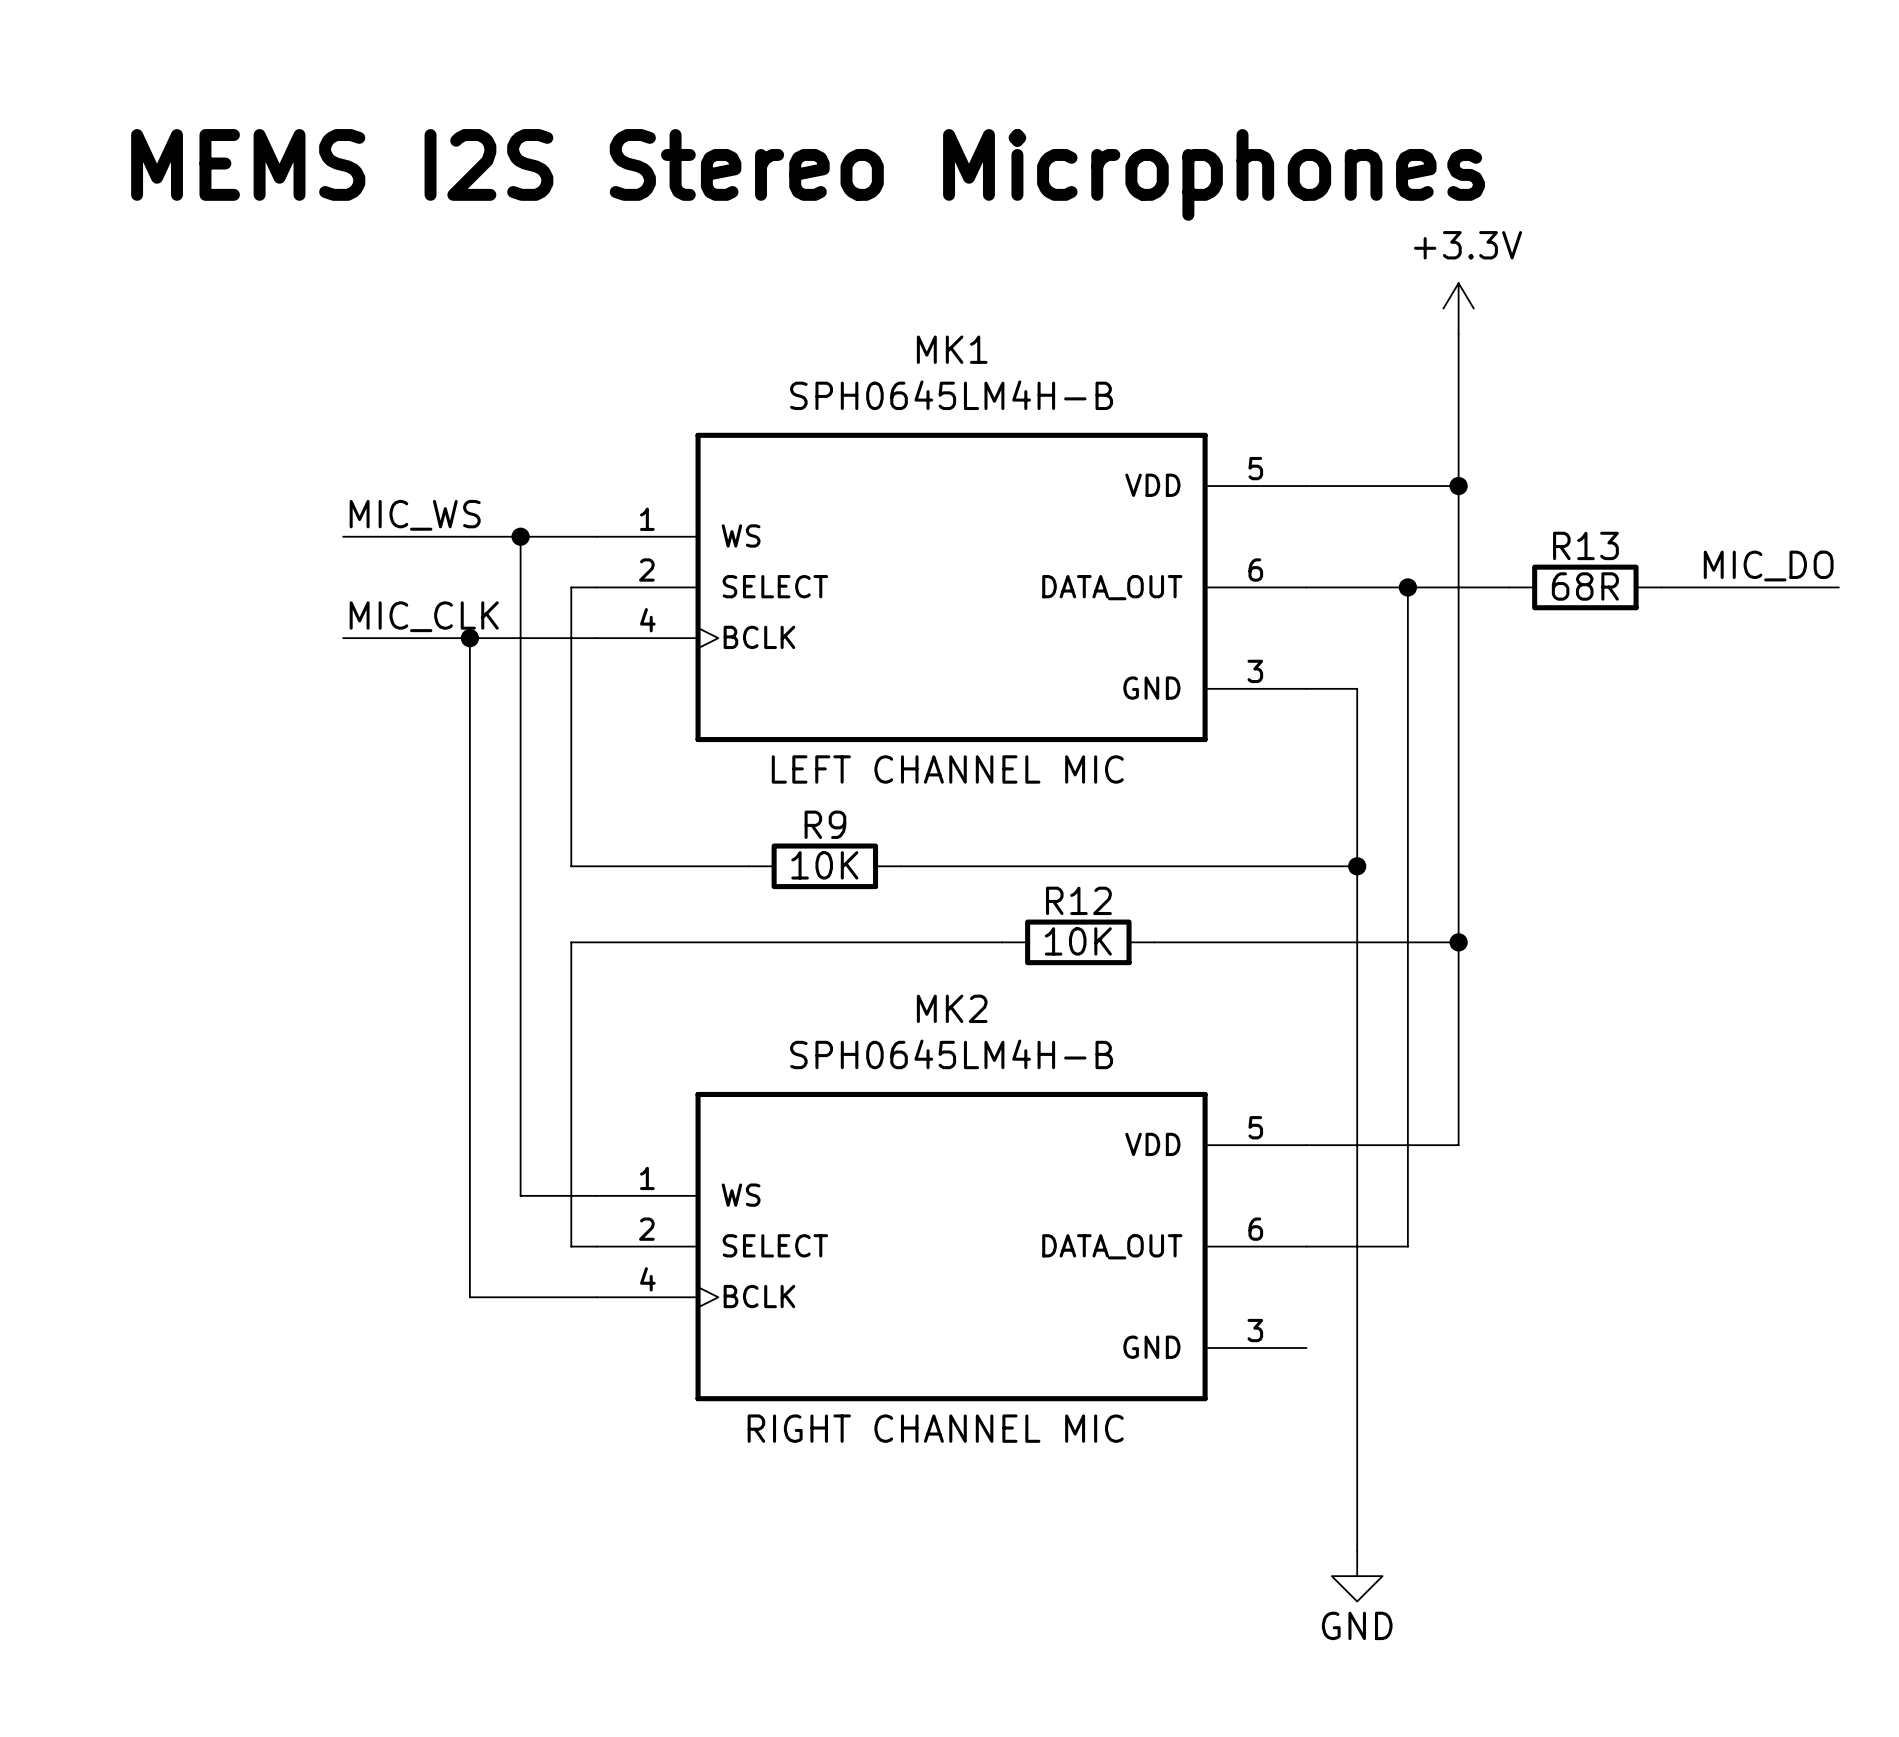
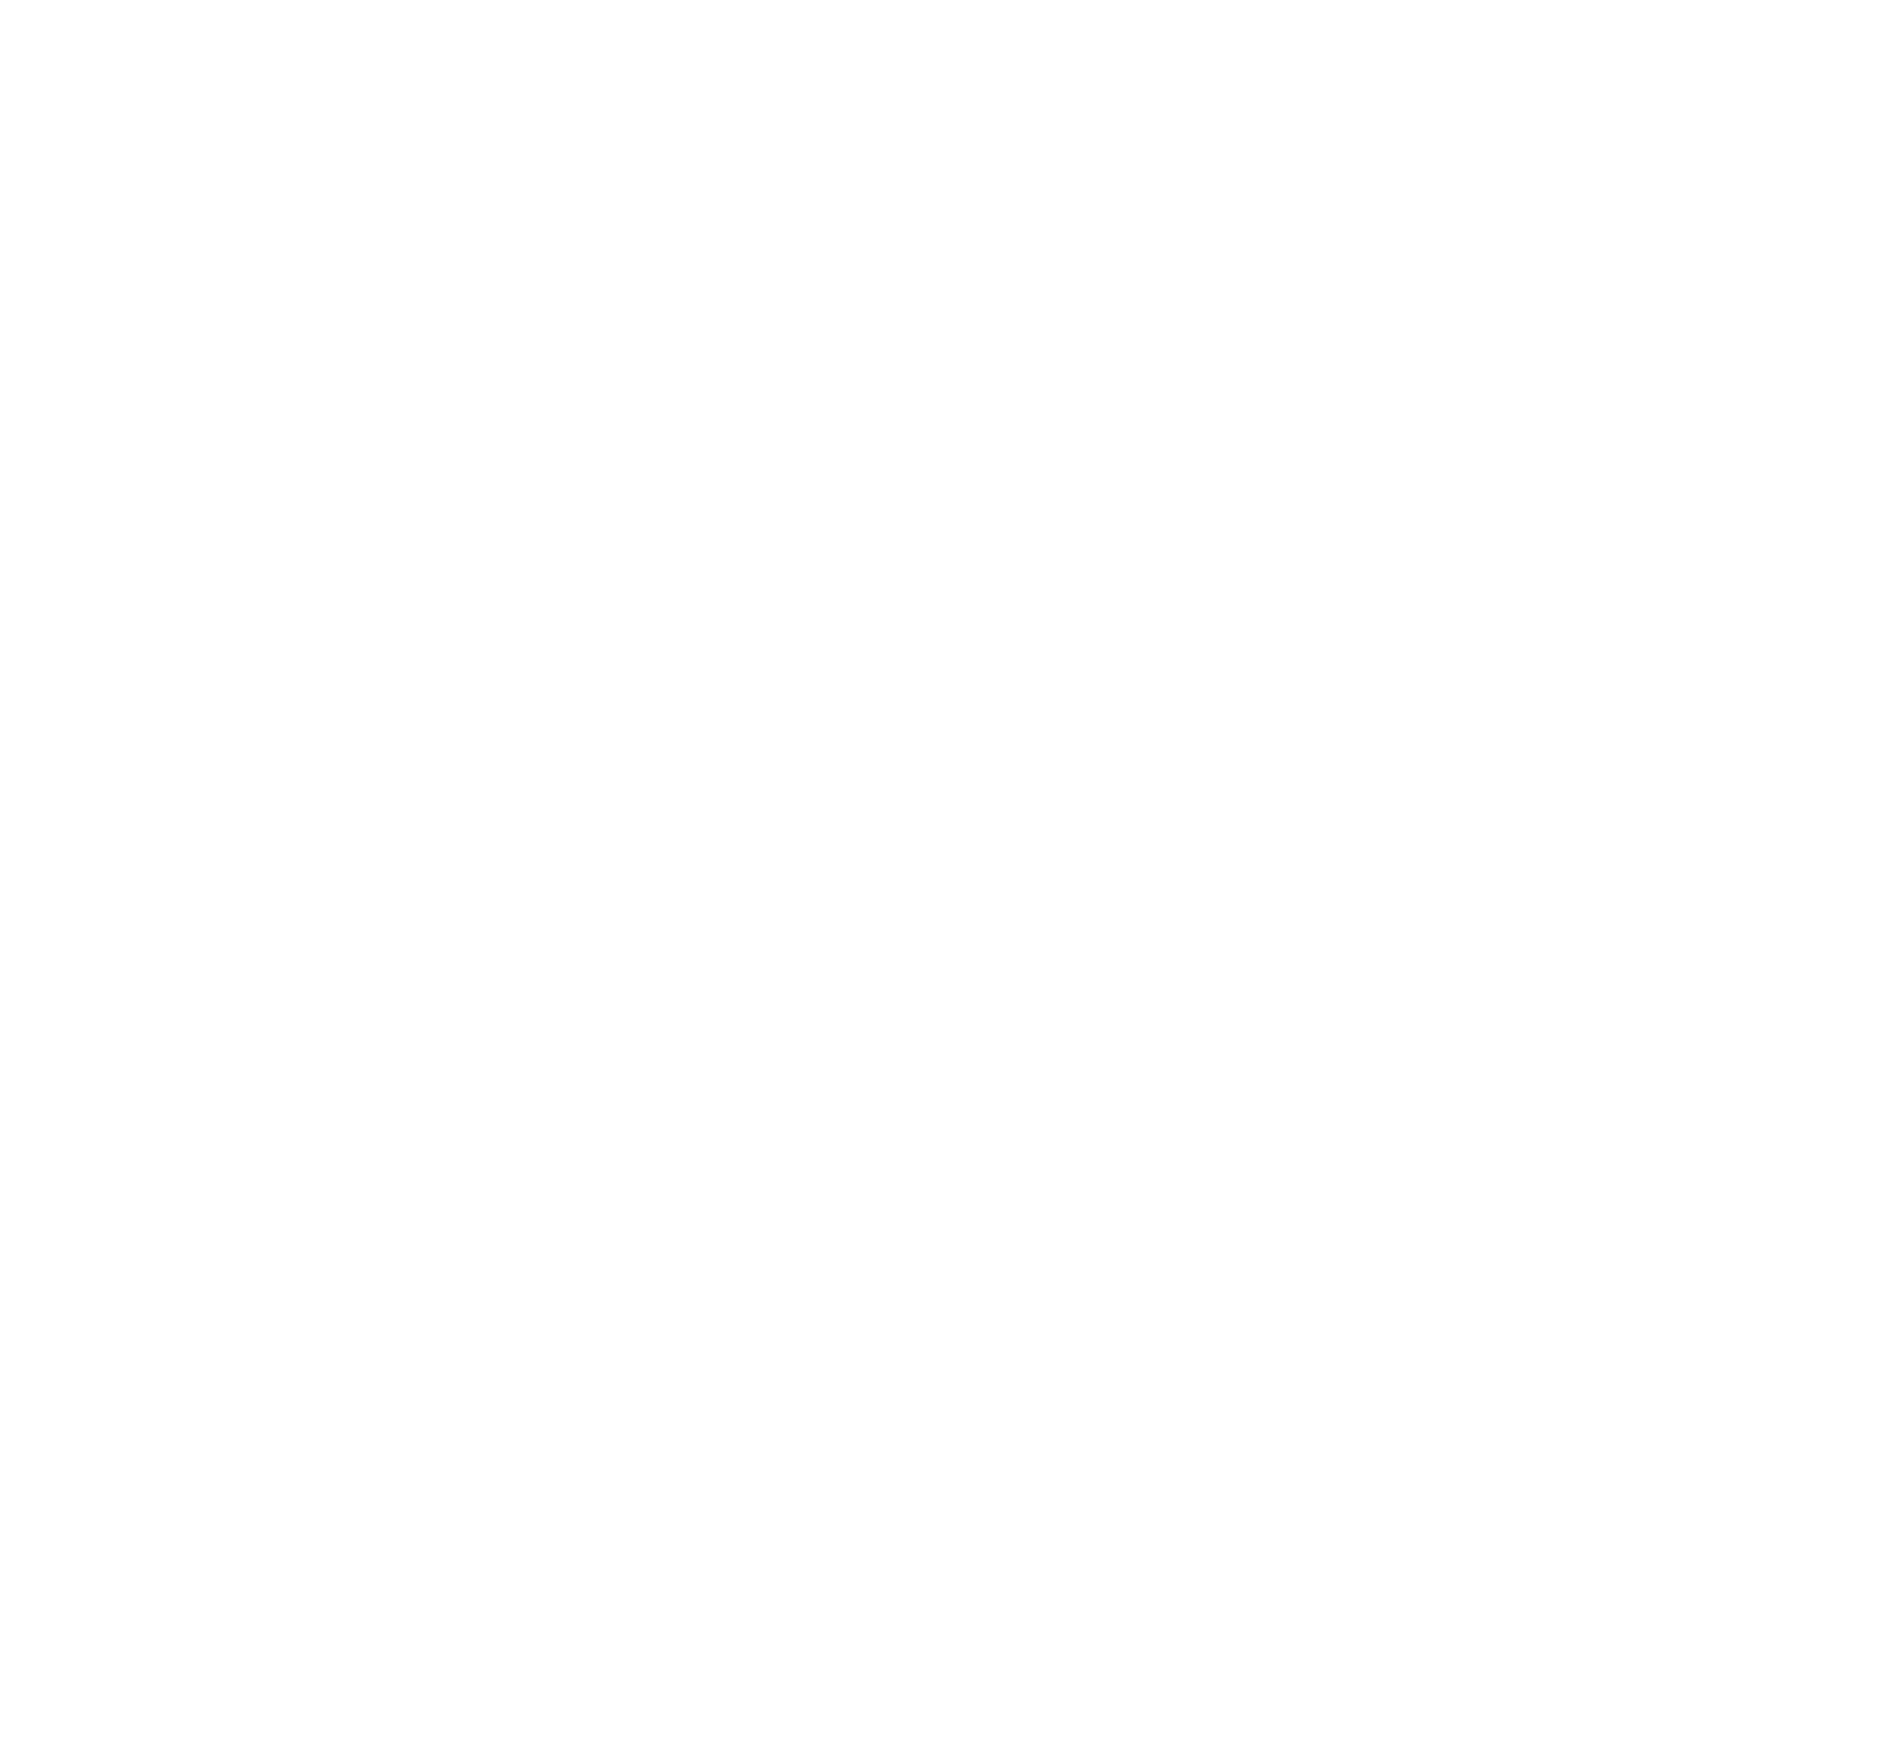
text: MEMS I2S Stereo Microphones (808, 174) -> none
power symbol: +3.3V (1458, 308) -> none
wire: (1458, 333) (1458, 1145) (1306, 1145) -> none
wire: (1306, 486) (1458, 486) -> none
junction: (1458, 486) -> none
label: MIC_WS (415, 515) -> none
wire: (343, 536) (596, 536) -> none
wire: (520, 536) (520, 1195) (596, 1195) -> none
junction: (520, 536) -> none
label: MIC_DO (1768, 566) -> none
wire: (596, 587) (571, 587) (571, 866) (748, 866) -> none
MK1: SPH0645LM4H-B (951, 587) -> none
wire: (1306, 587) (1509, 587) -> none
wire: (1407, 587) (1407, 1246) (1306, 1246) -> none
junction: (1407, 587) -> none
R13: 68R (1585, 587) -> none
wire: (1661, 587) (1838, 587) -> none
label: MIC_CLK (424, 616) -> none
wire: (343, 638) (596, 638) -> none
wire: (469, 638) (469, 1297) (596, 1297) -> none
junction: (469, 638) -> none
wire: (1306, 688) (1357, 688) (1357, 1550) -> none
text: LEFT CHANNEL MIC (947, 769) -> none
R9: 10K (824, 866) -> none
wire: (900, 866) (1357, 866) -> none
junction: (1357, 866) -> none
wire: (1002, 942) (571, 942) (571, 1246) (596, 1246) -> none
R12: 10K (1078, 942) -> none
wire: (1154, 942) (1458, 942) -> none
junction: (1458, 942) -> none
MK2: SPH0645LM4H-B (951, 1246) -> none
text: RIGHT CHANNEL MIC (935, 1428) -> none
power symbol: GND (1357, 1576) -> none

